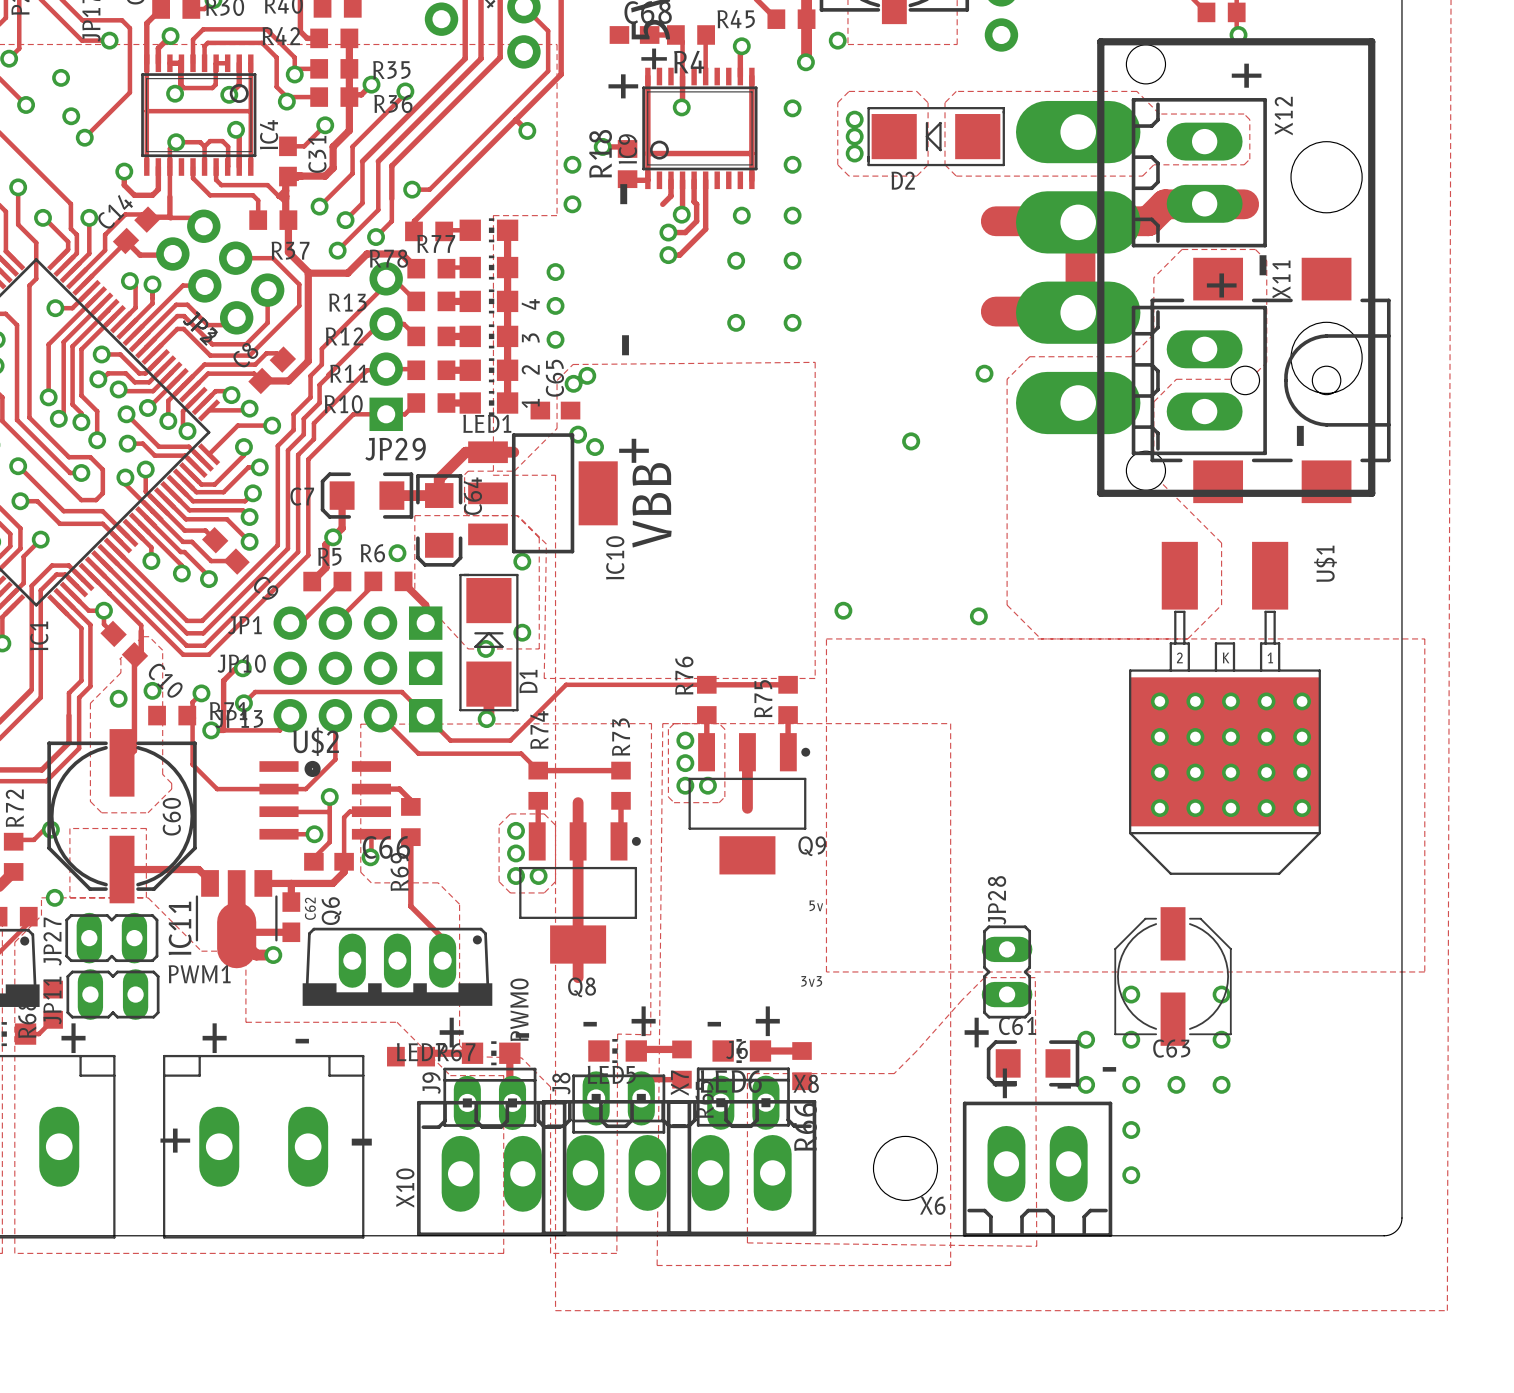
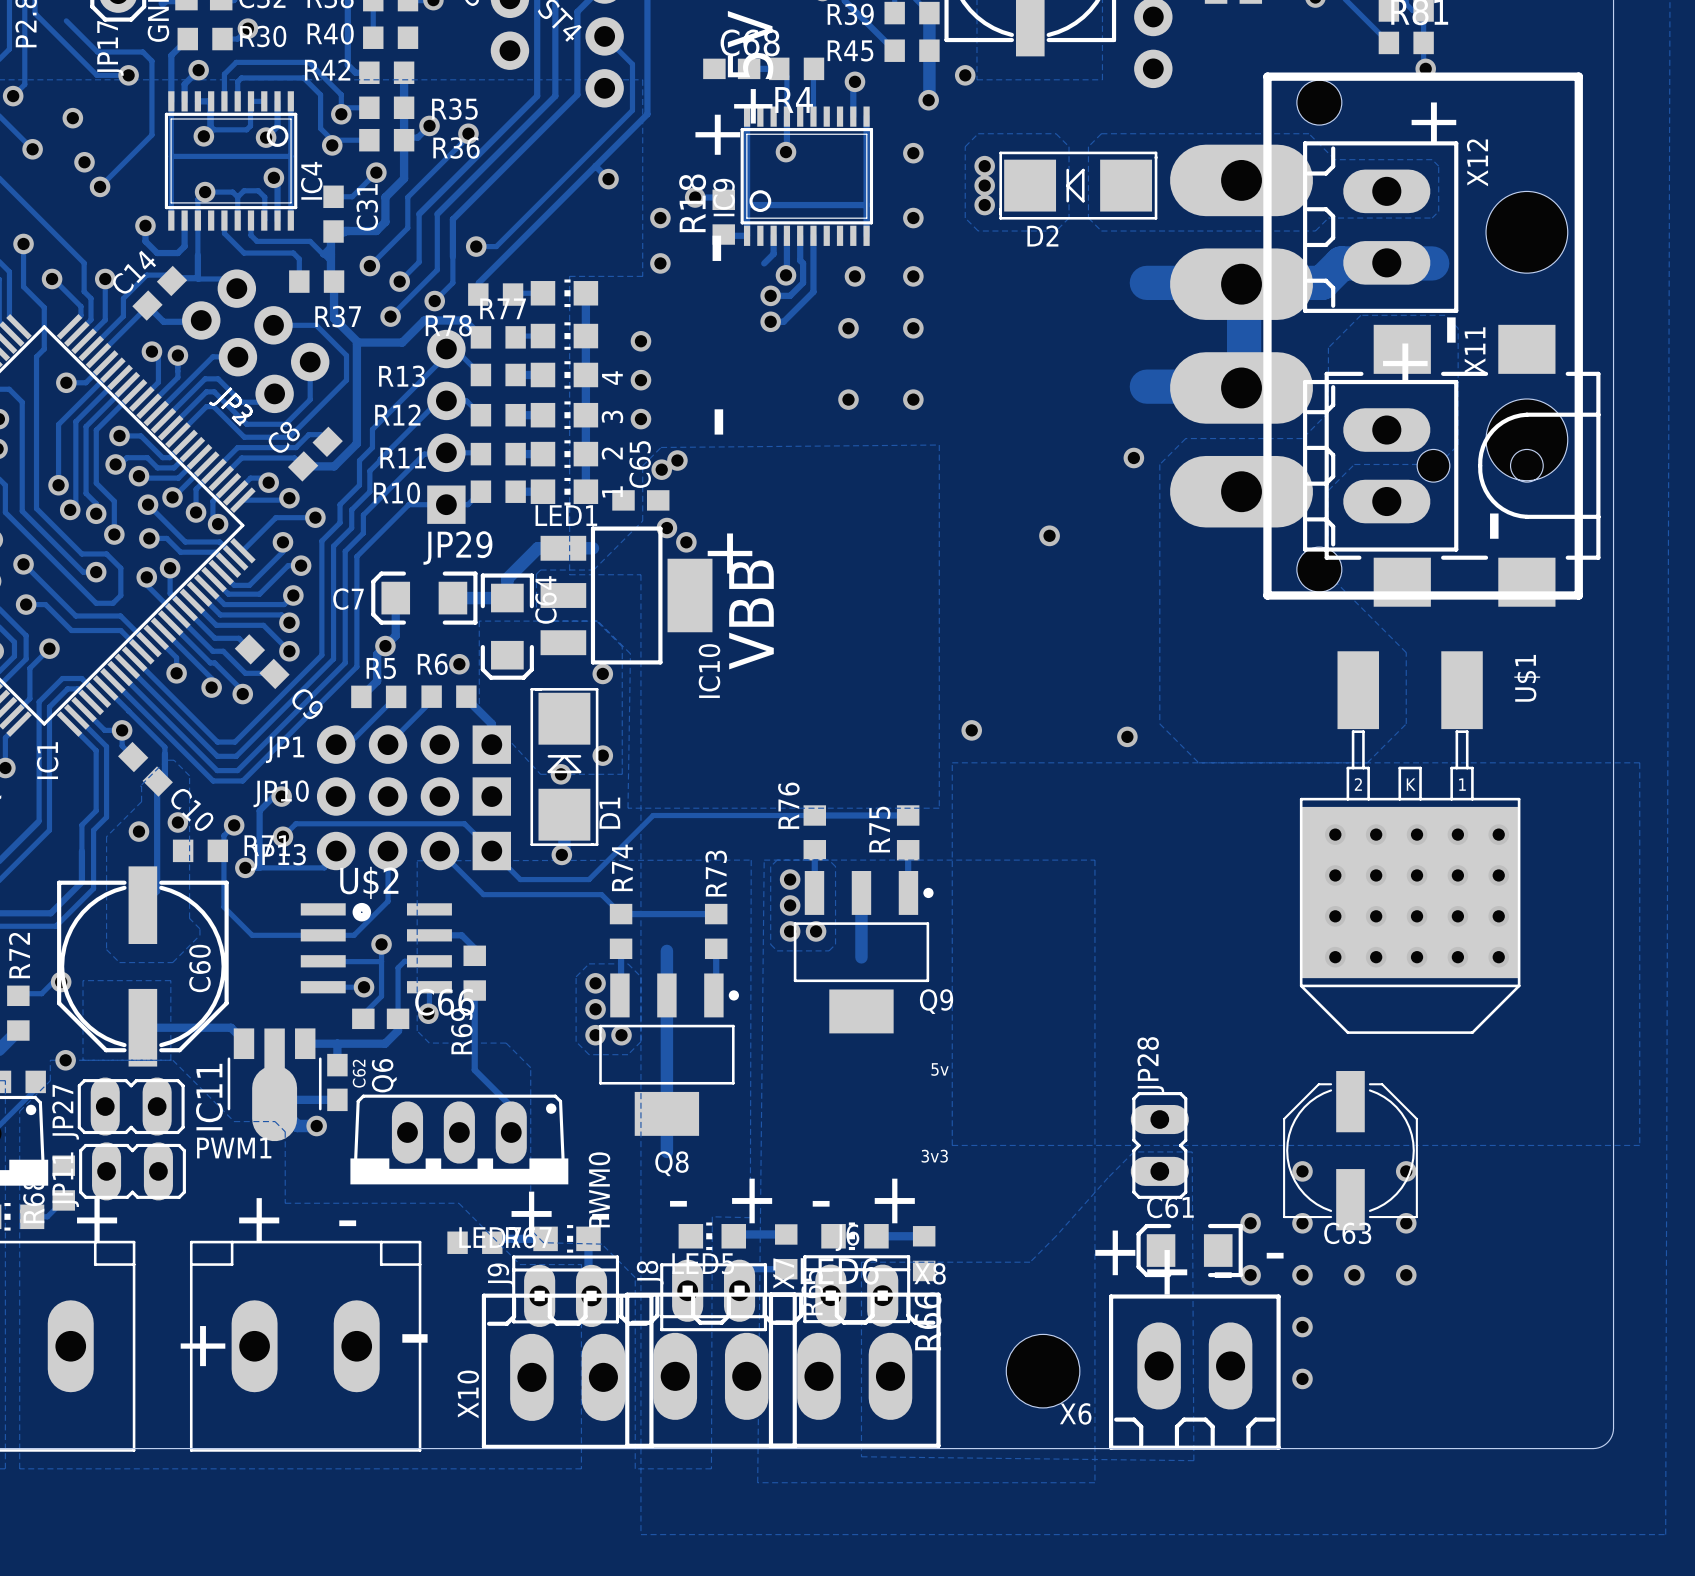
text position: + (976, 1032) -> + (1115, 1252)

